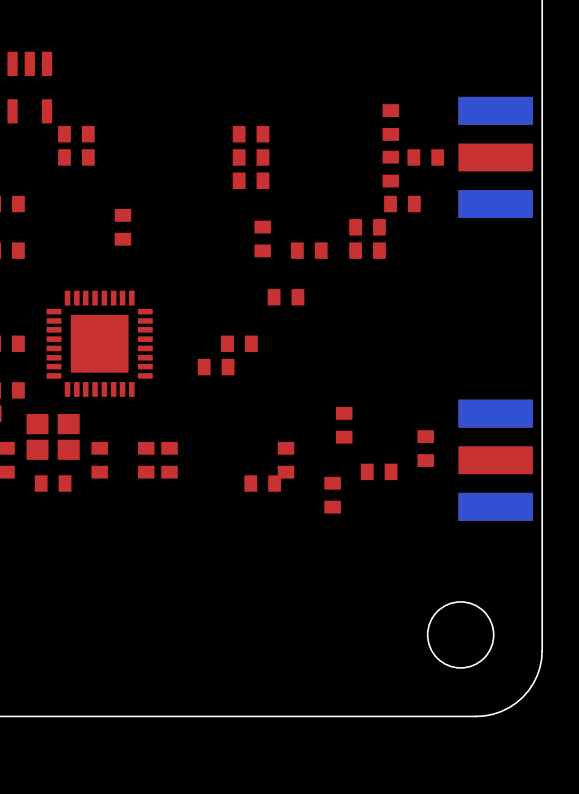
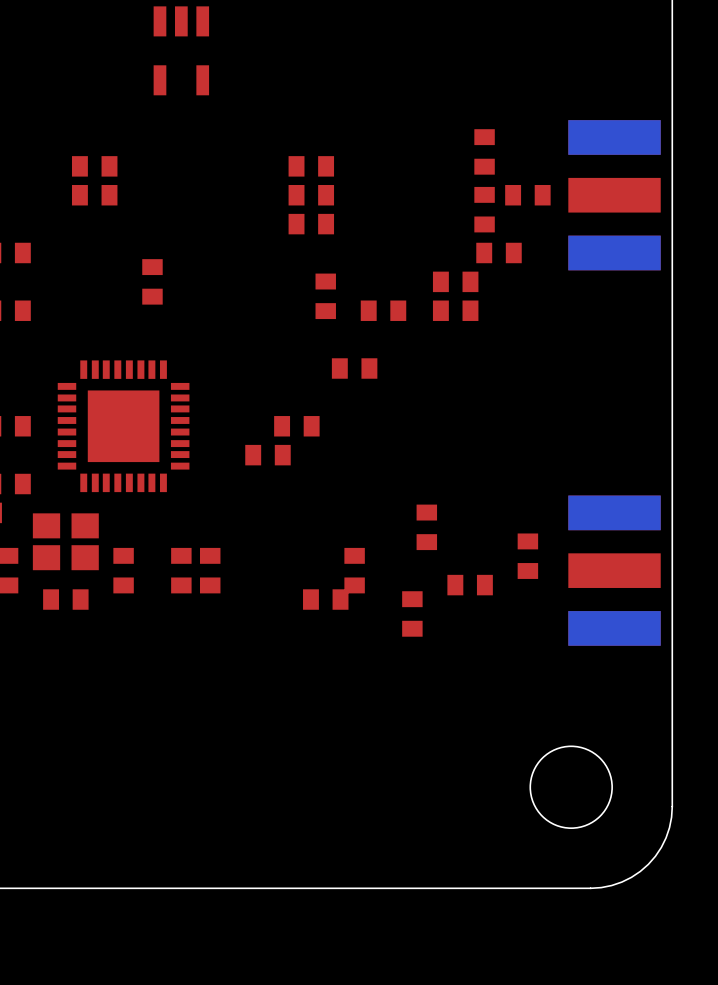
part position: (29, 87) -> (181, 50)

